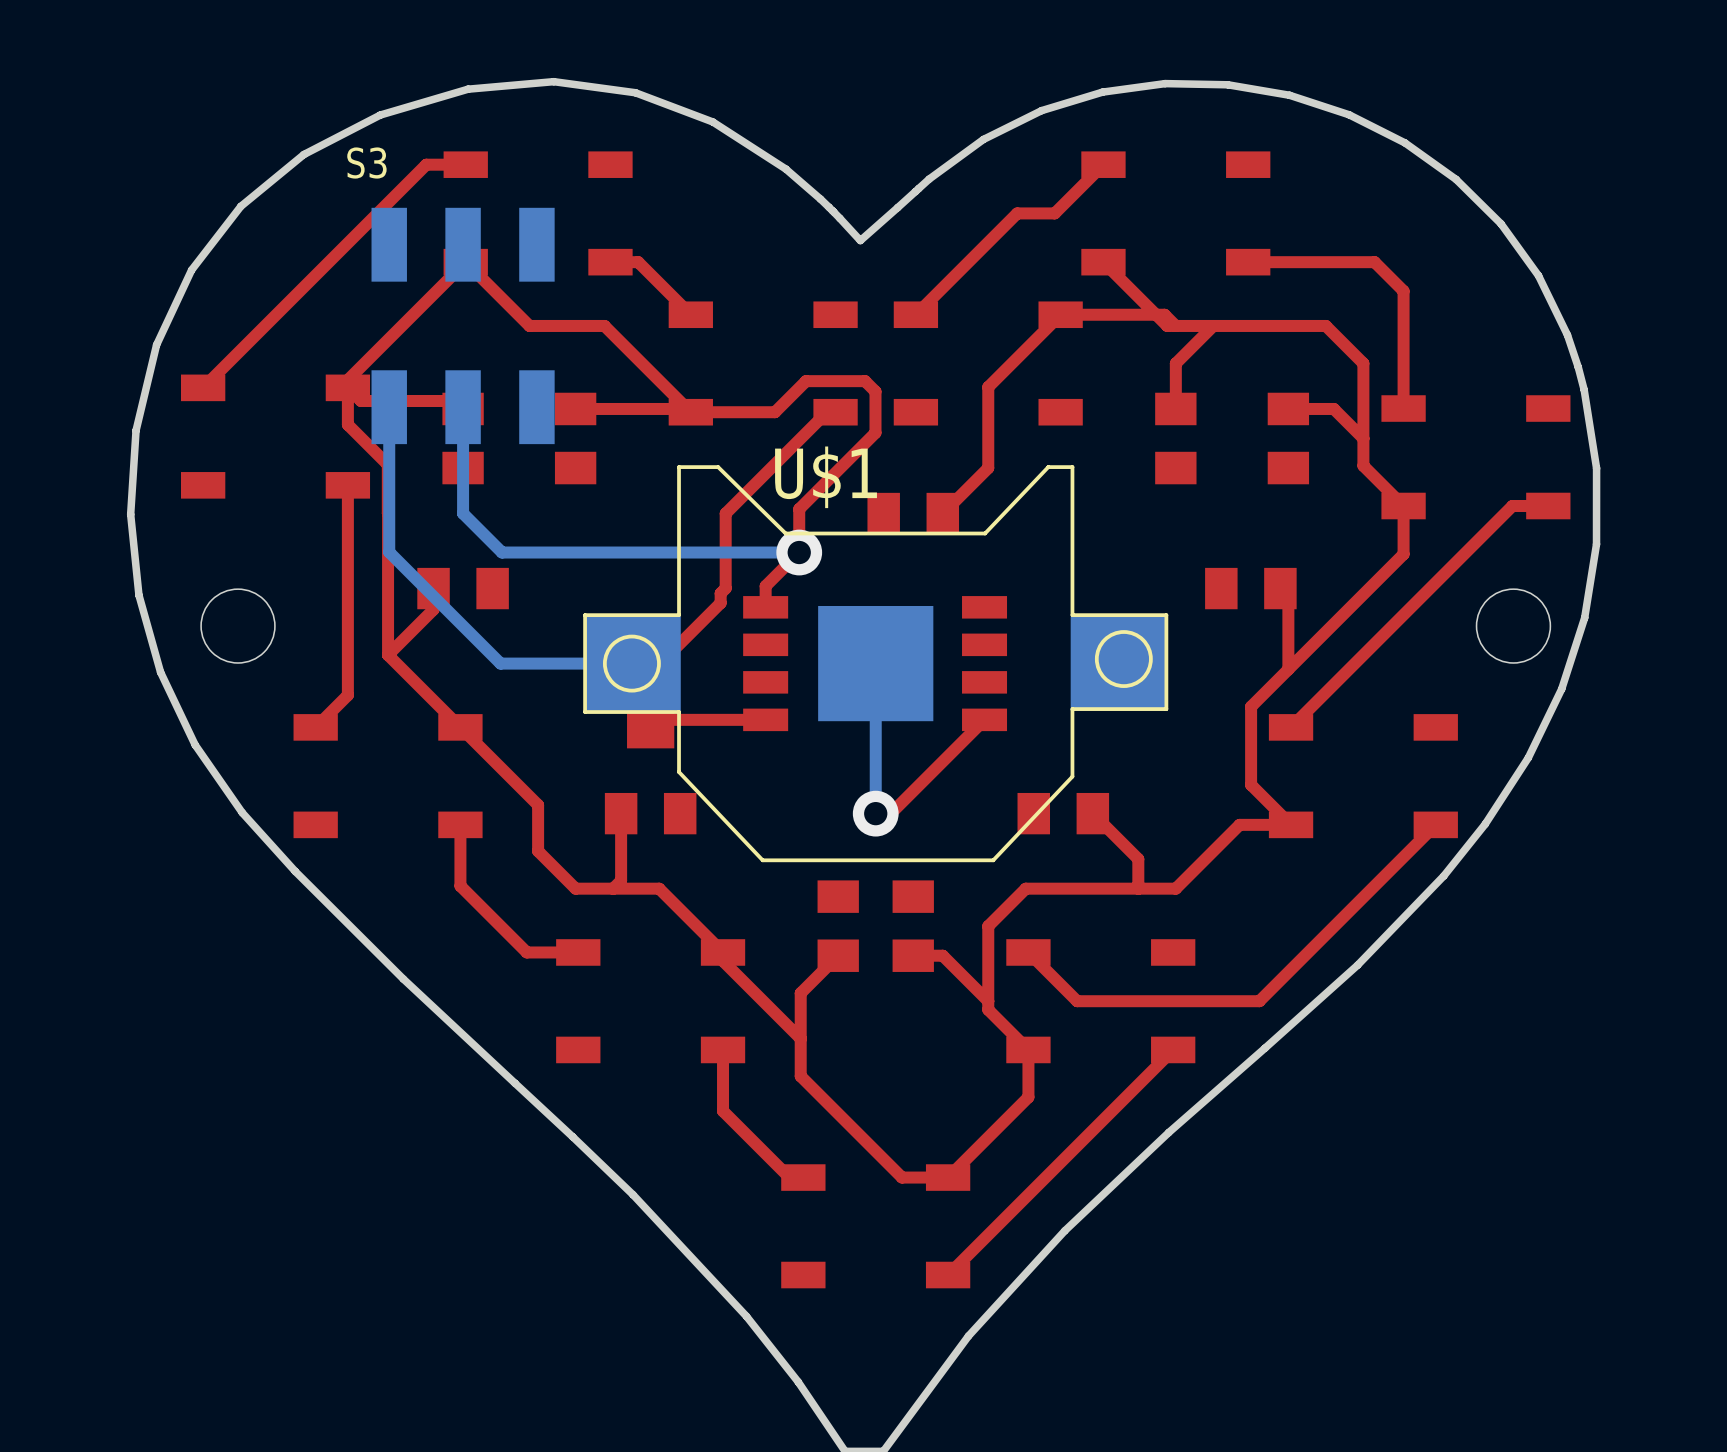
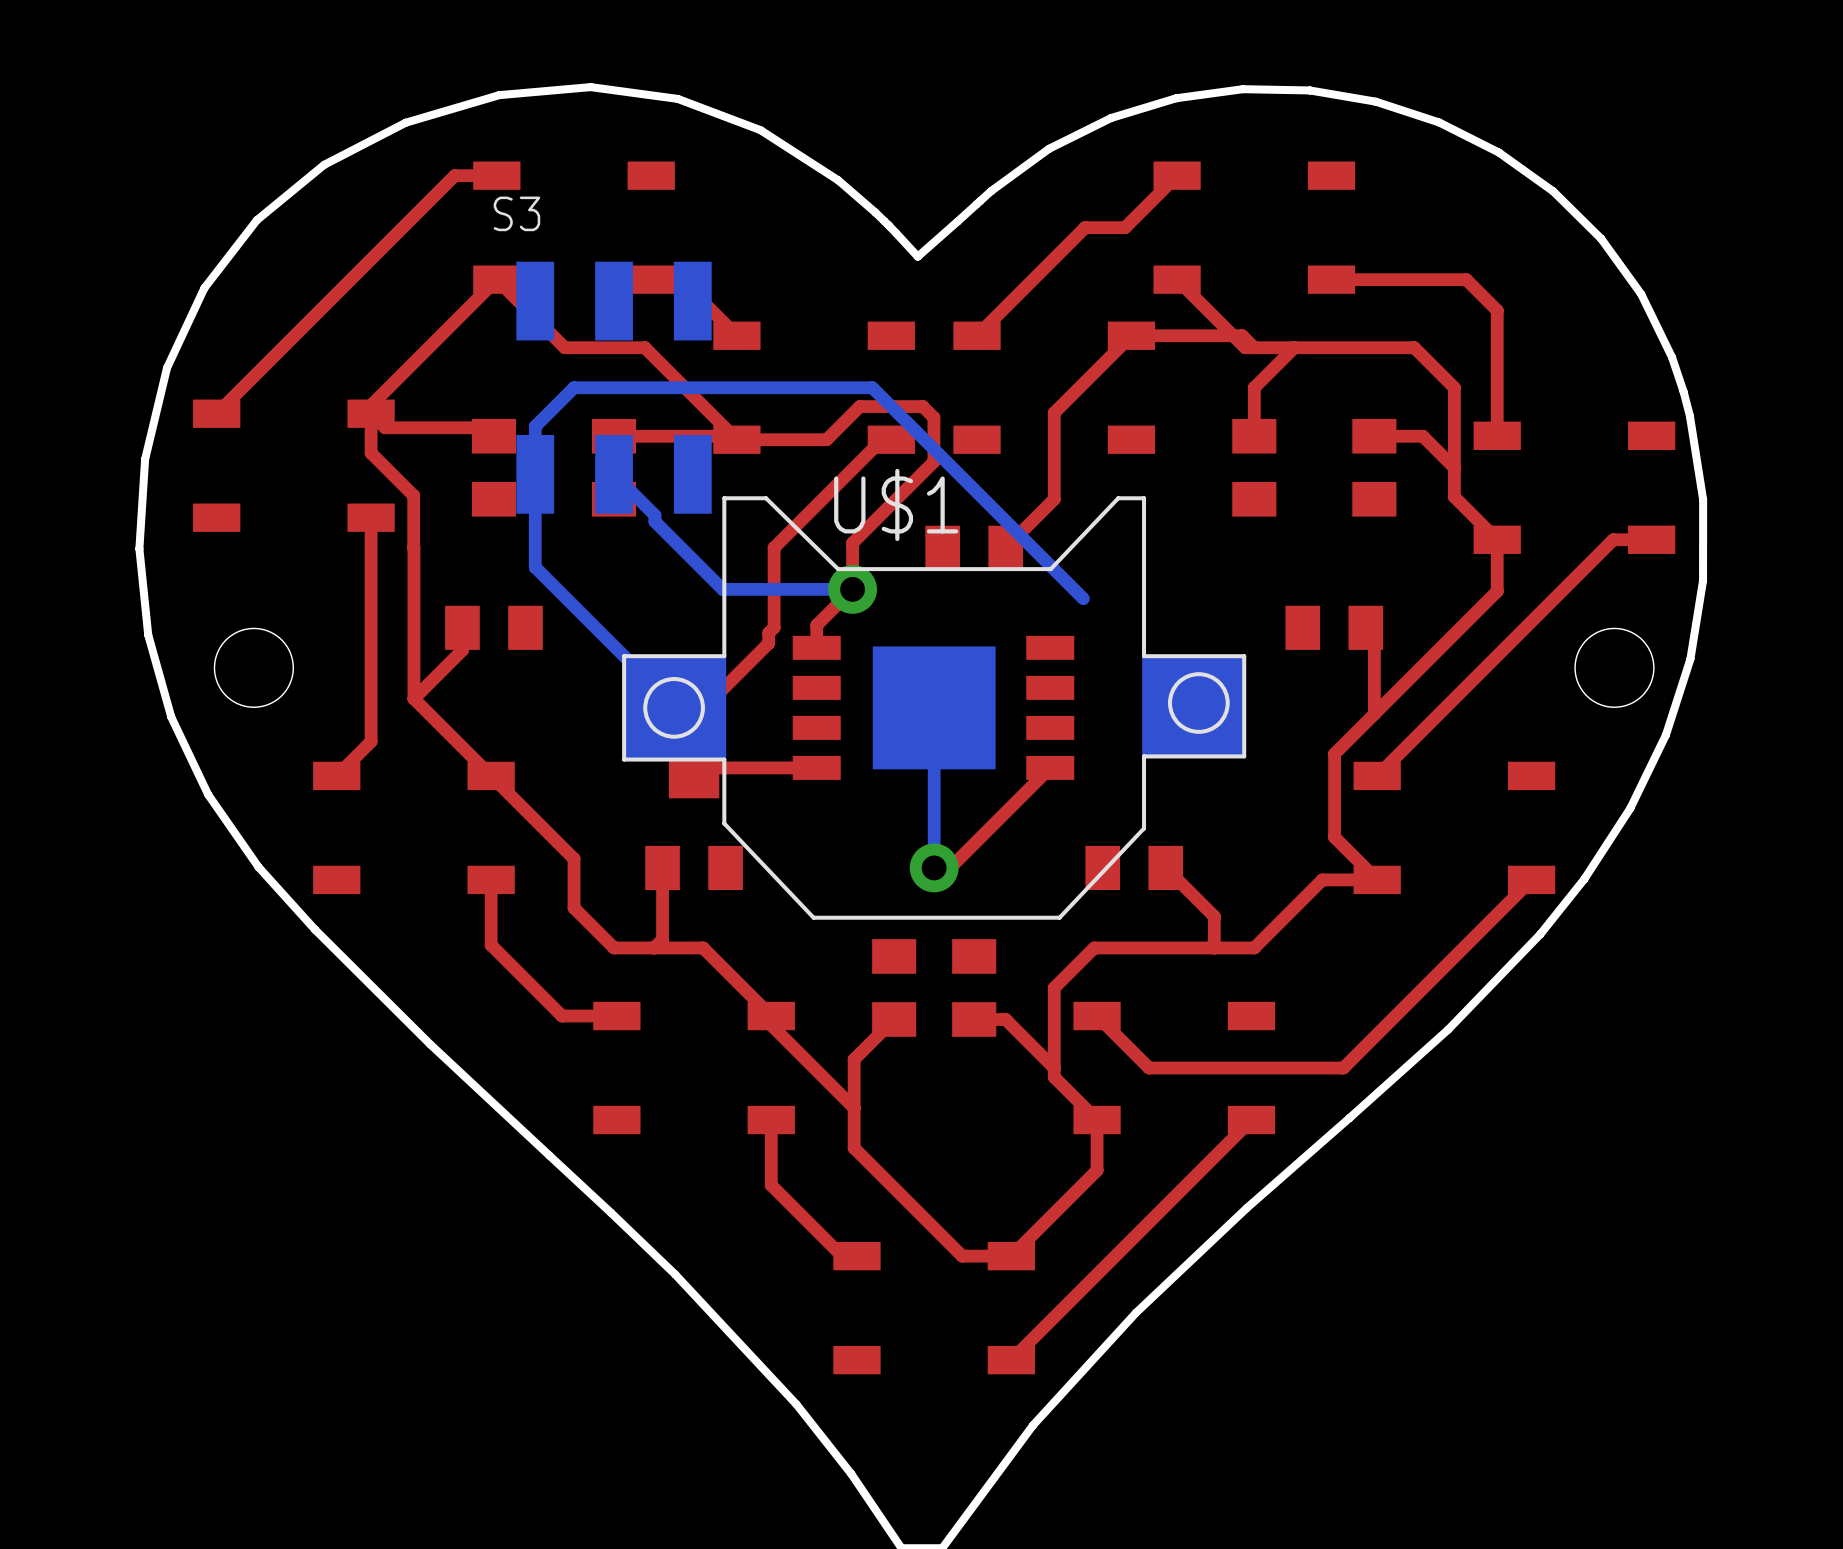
S3 position: (463, 325) -> (614, 387)
bottom track: (389, 407) (389, 552) (500, 663) (633, 663) -> (1083, 598) (872, 387) (574, 387) (535, 426) (535, 567) (675, 707)
bottom track: (463, 407) (463, 513) (502, 552) (677, 552) -> (614, 507) (614, 474) (654, 515) (654, 521) (722, 589)

